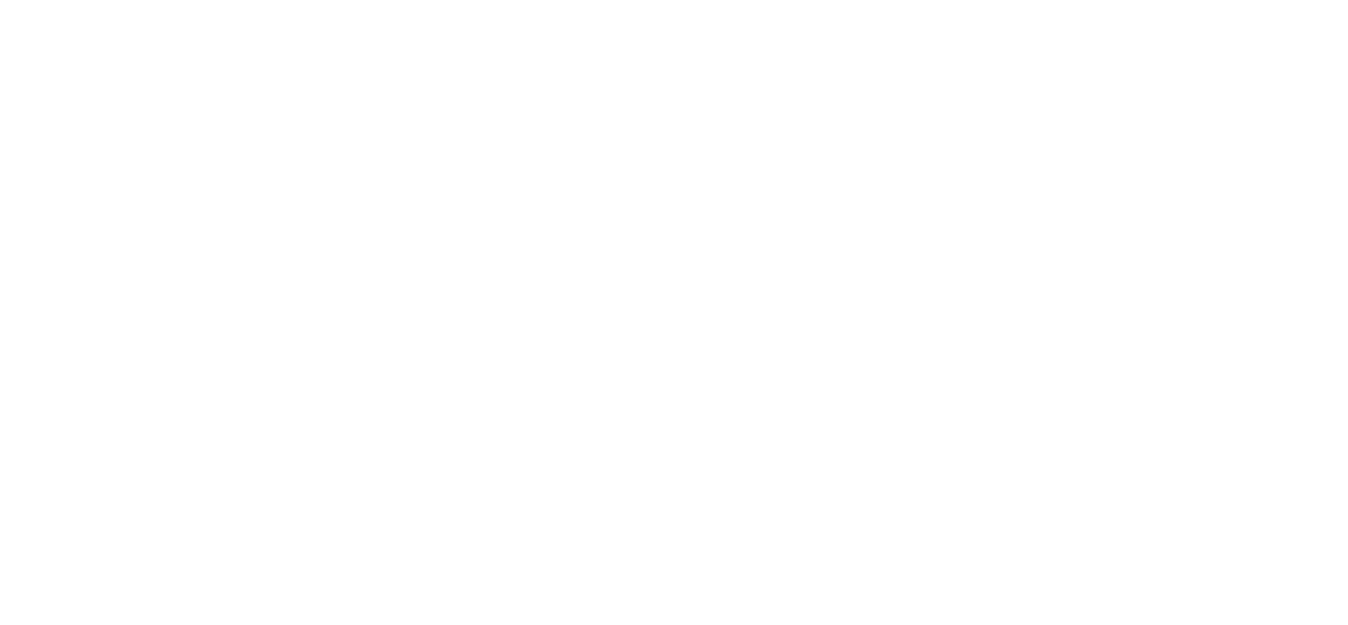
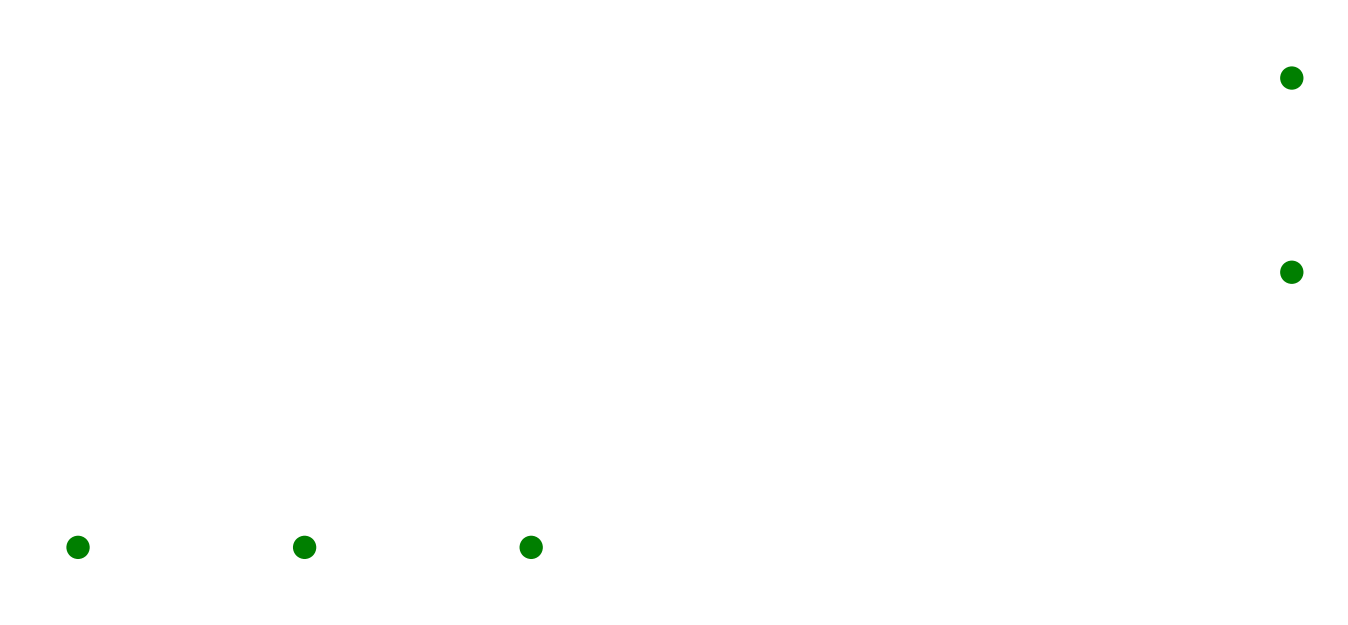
junction: none -> (1291, 78)
junction: none -> (1291, 272)
junction: none -> (78, 547)
junction: none -> (304, 547)
junction: none -> (531, 547)

